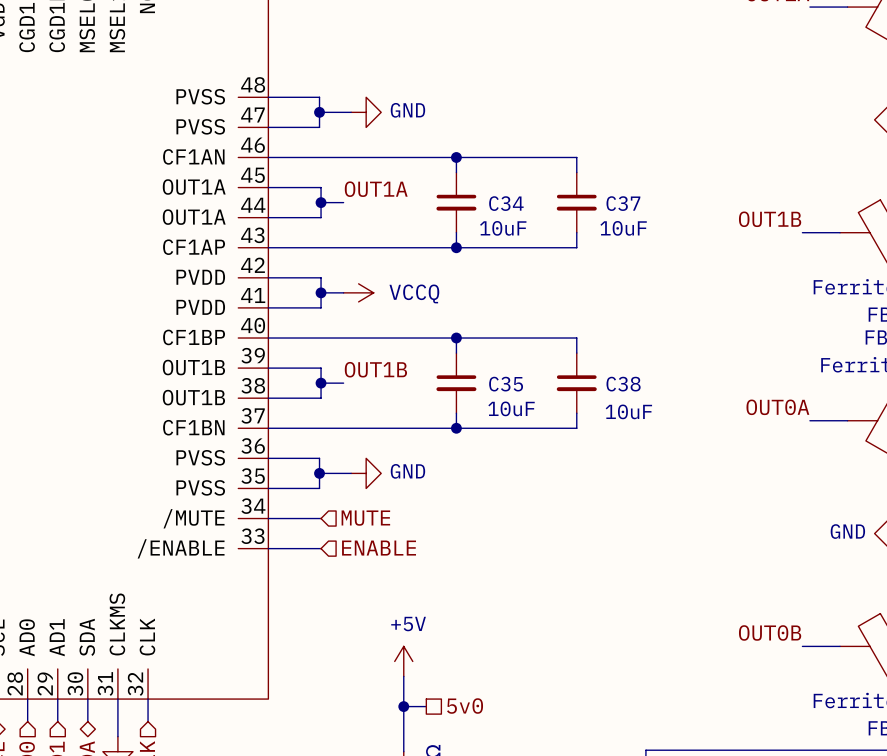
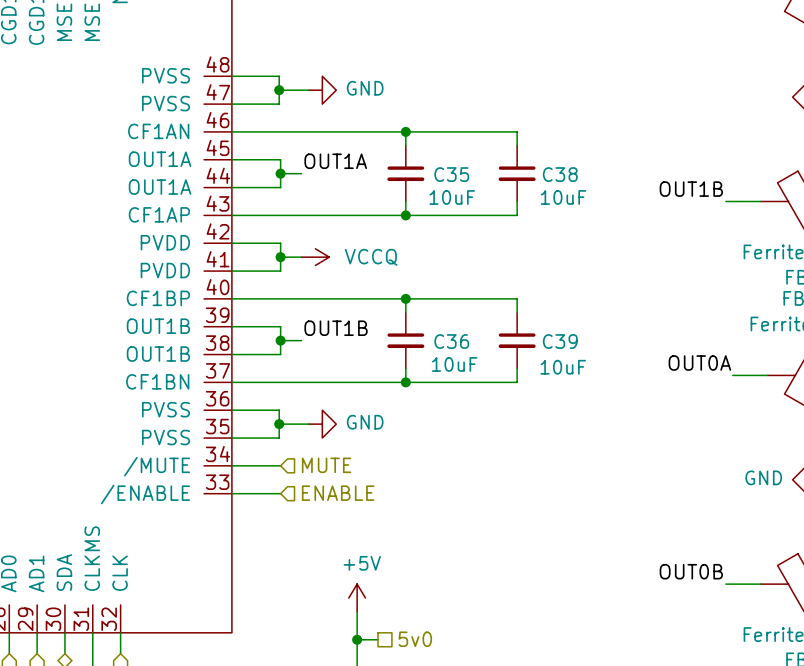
C34 name: C34 (506, 203) -> C35 (451, 174)
C37 name: C37 (623, 203) -> C38 (560, 174)
C35 name: C35 (506, 384) -> C36 (451, 341)
C38 name: C38 (623, 384) -> C39 (560, 341)

